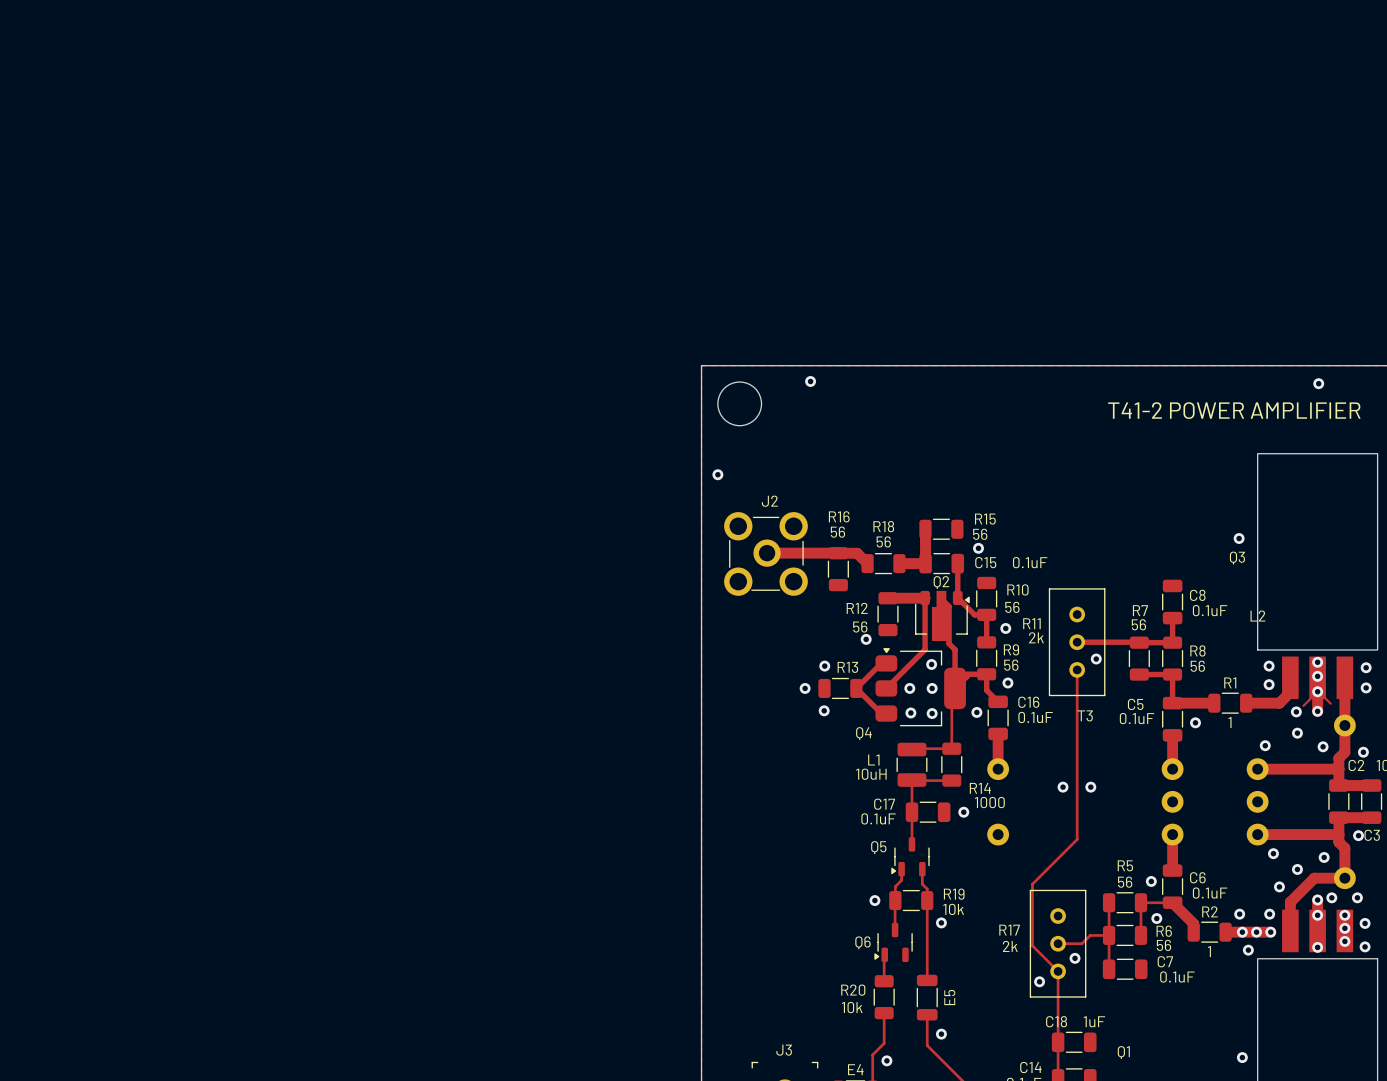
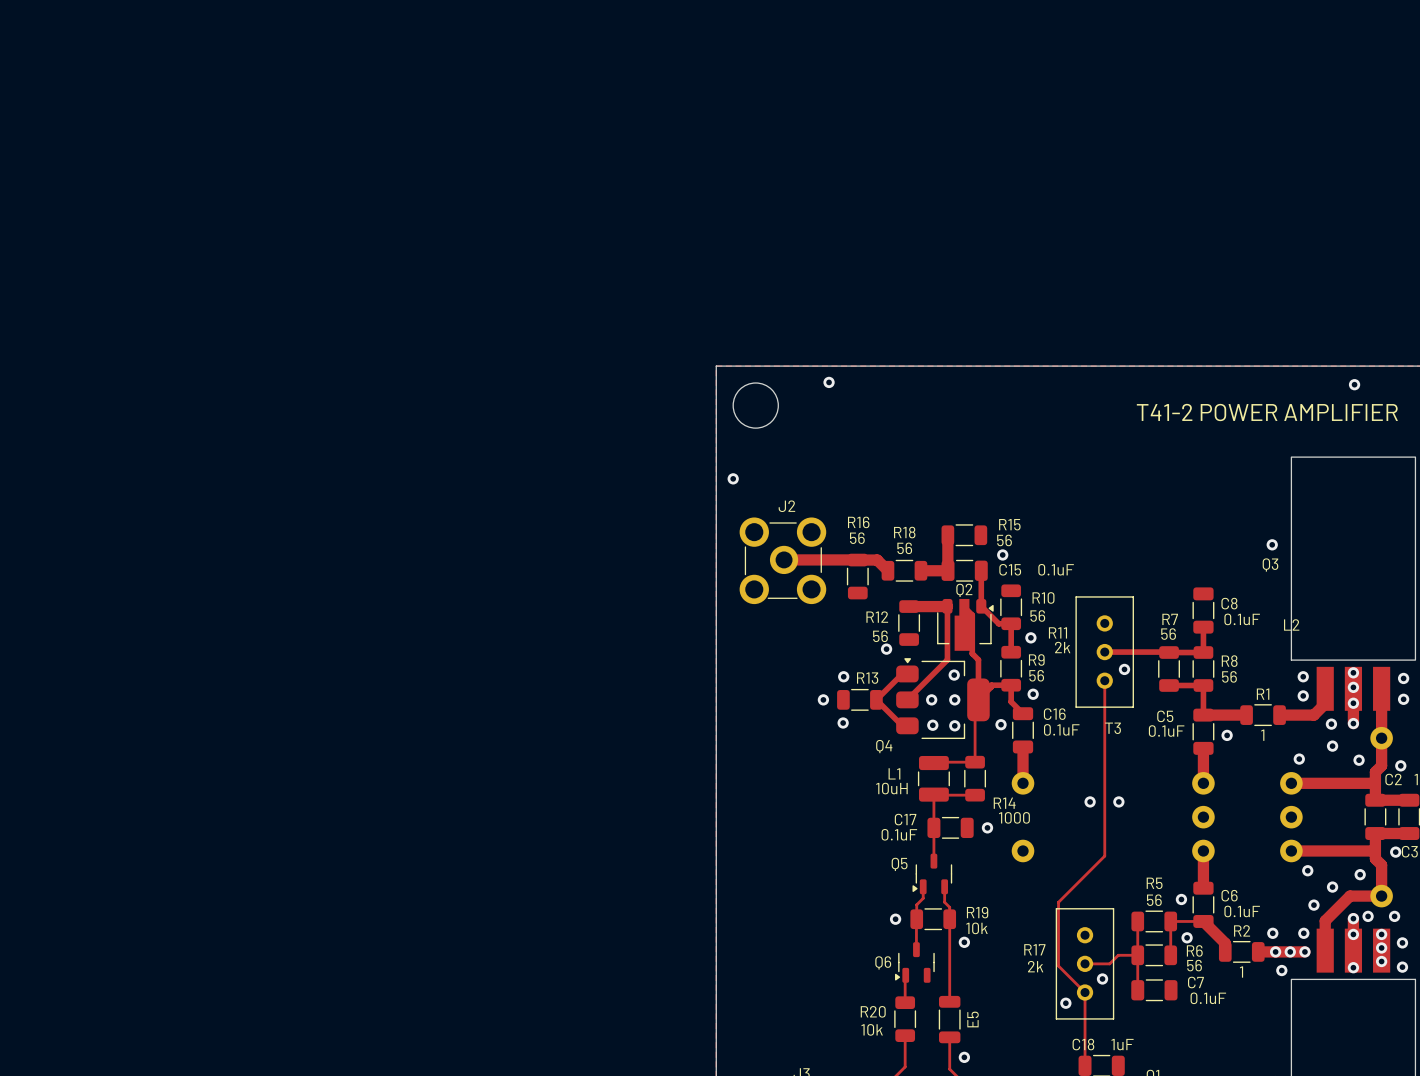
track: (1317, 691) (1303, 705) -> none
track: (1318, 691) (1330, 703) -> none

